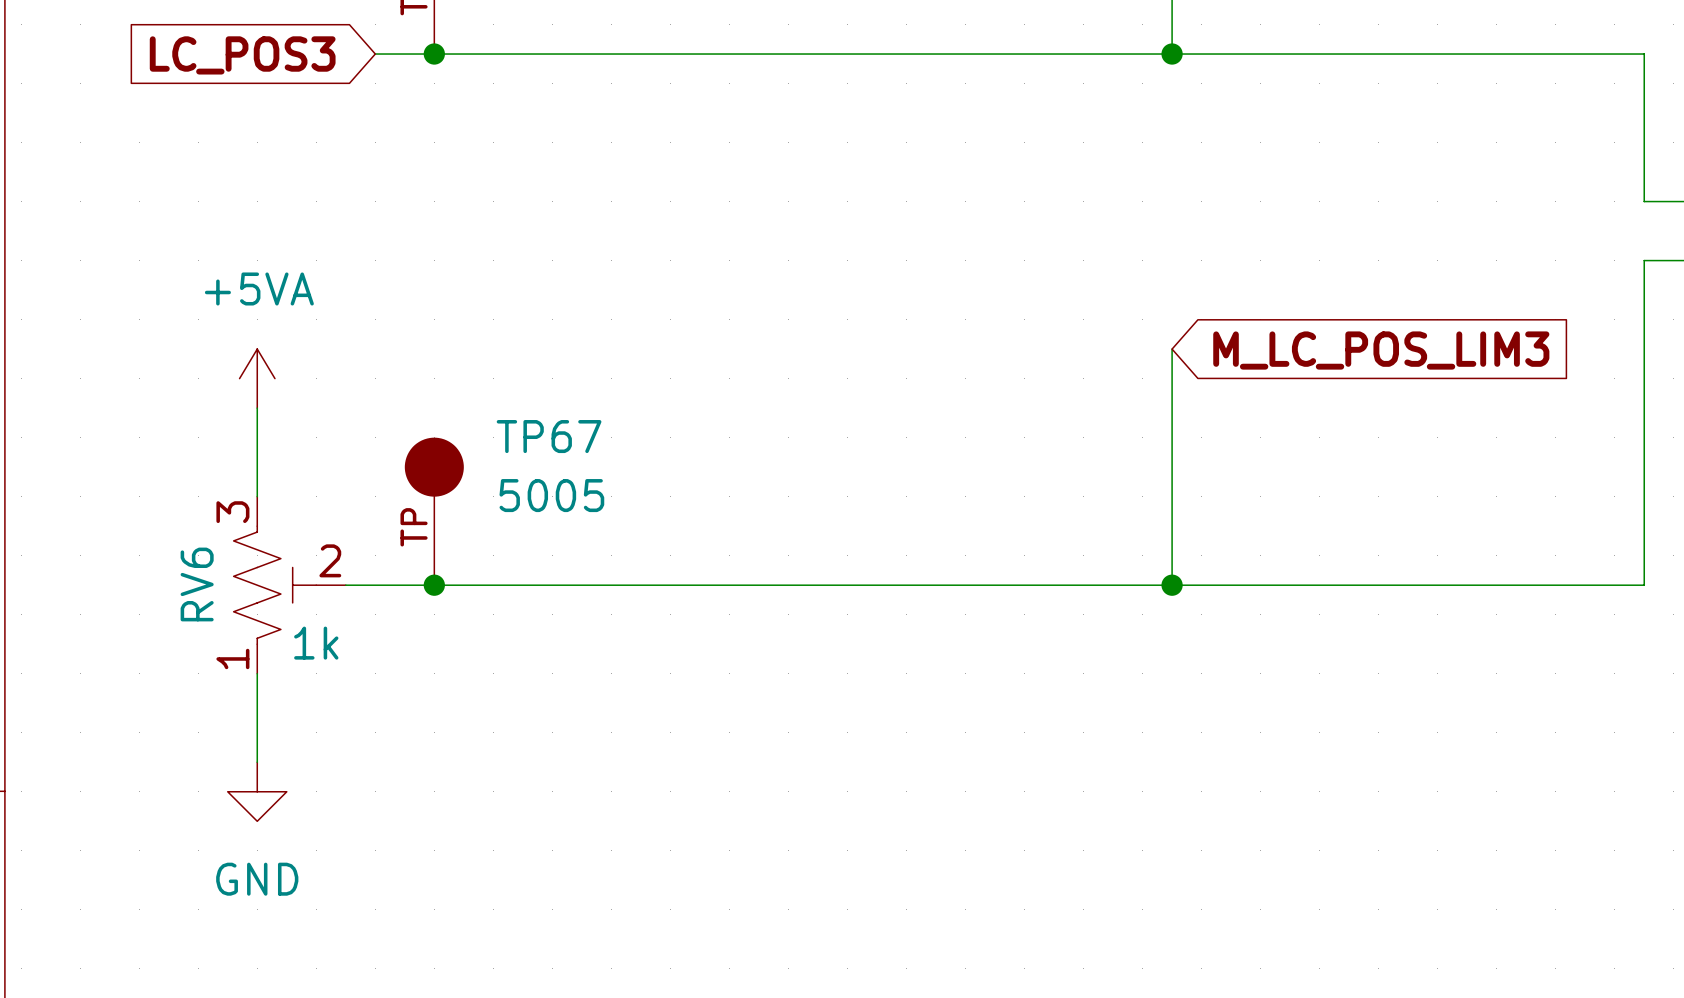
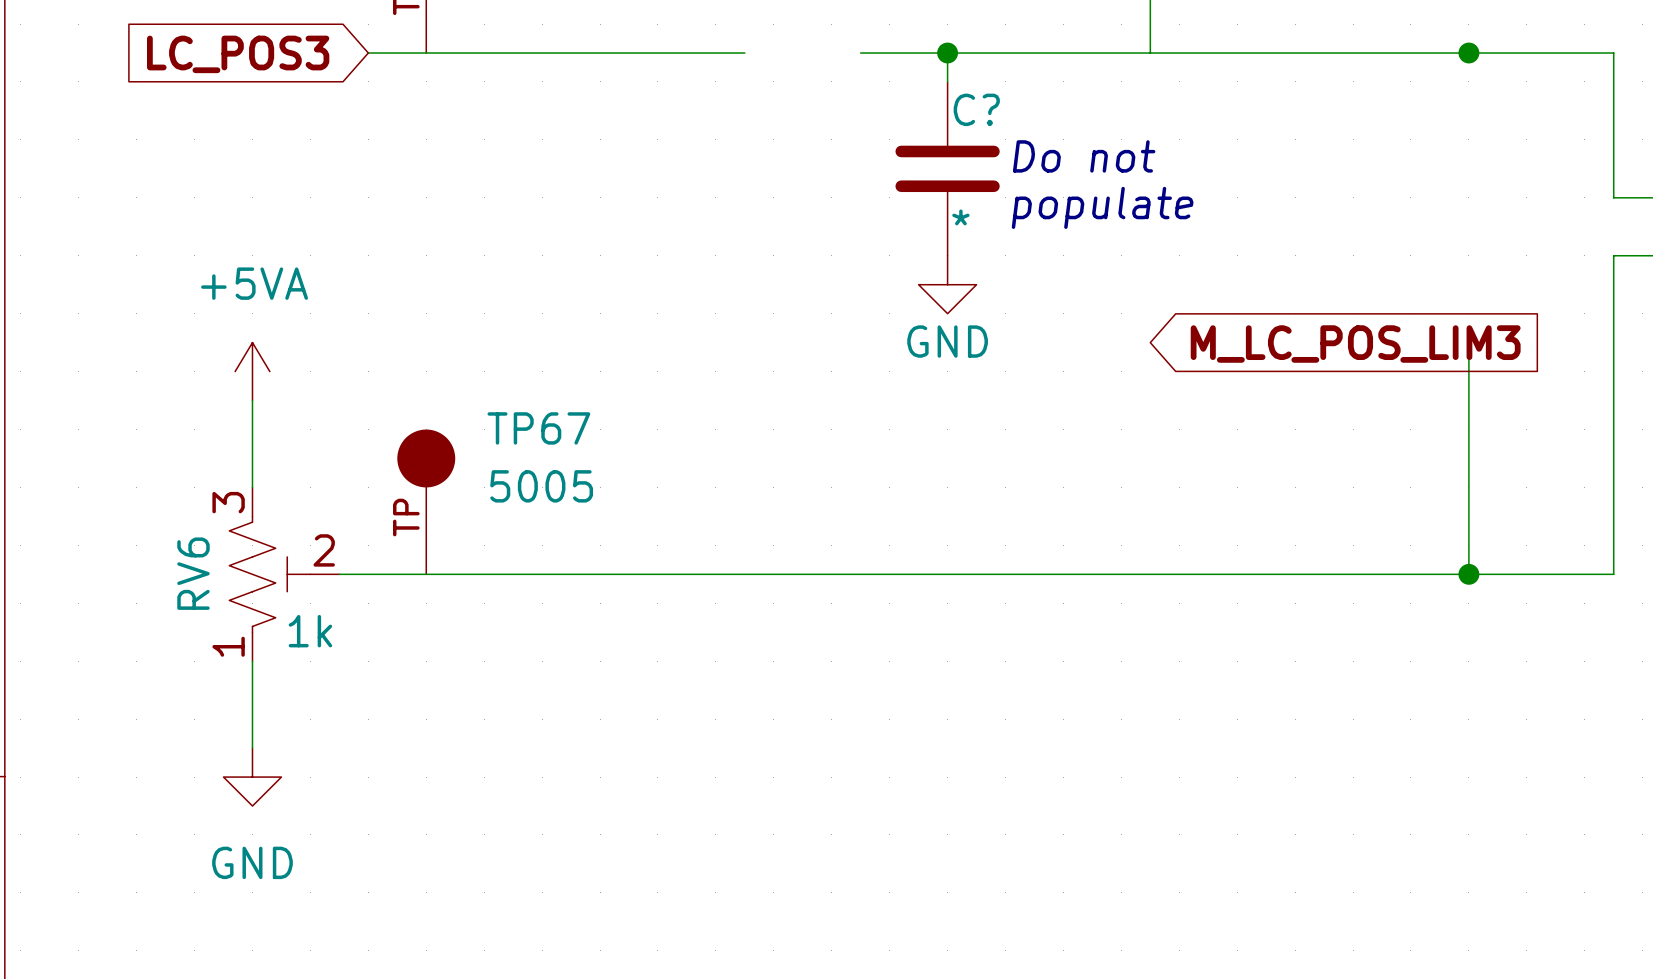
junction: (434, 54) -> none
wire: (758, 54) (876, 54) -> none
wire: none -> (947, 53) (947, 81)
junction: none -> (947, 53)
junction: (1172, 54) -> none
junction: none -> (1468, 53)
text: none -> Do not (1084, 156)
C?: none -> * (947, 168)
text: none -> populate (1102, 207)
power symbol: none -> GND (947, 284)
wire: (1172, 349) (1172, 585) -> (1468, 342) (1468, 574)
junction: (434, 585) -> none
junction: (1172, 585) -> none
junction: none -> (1468, 574)

